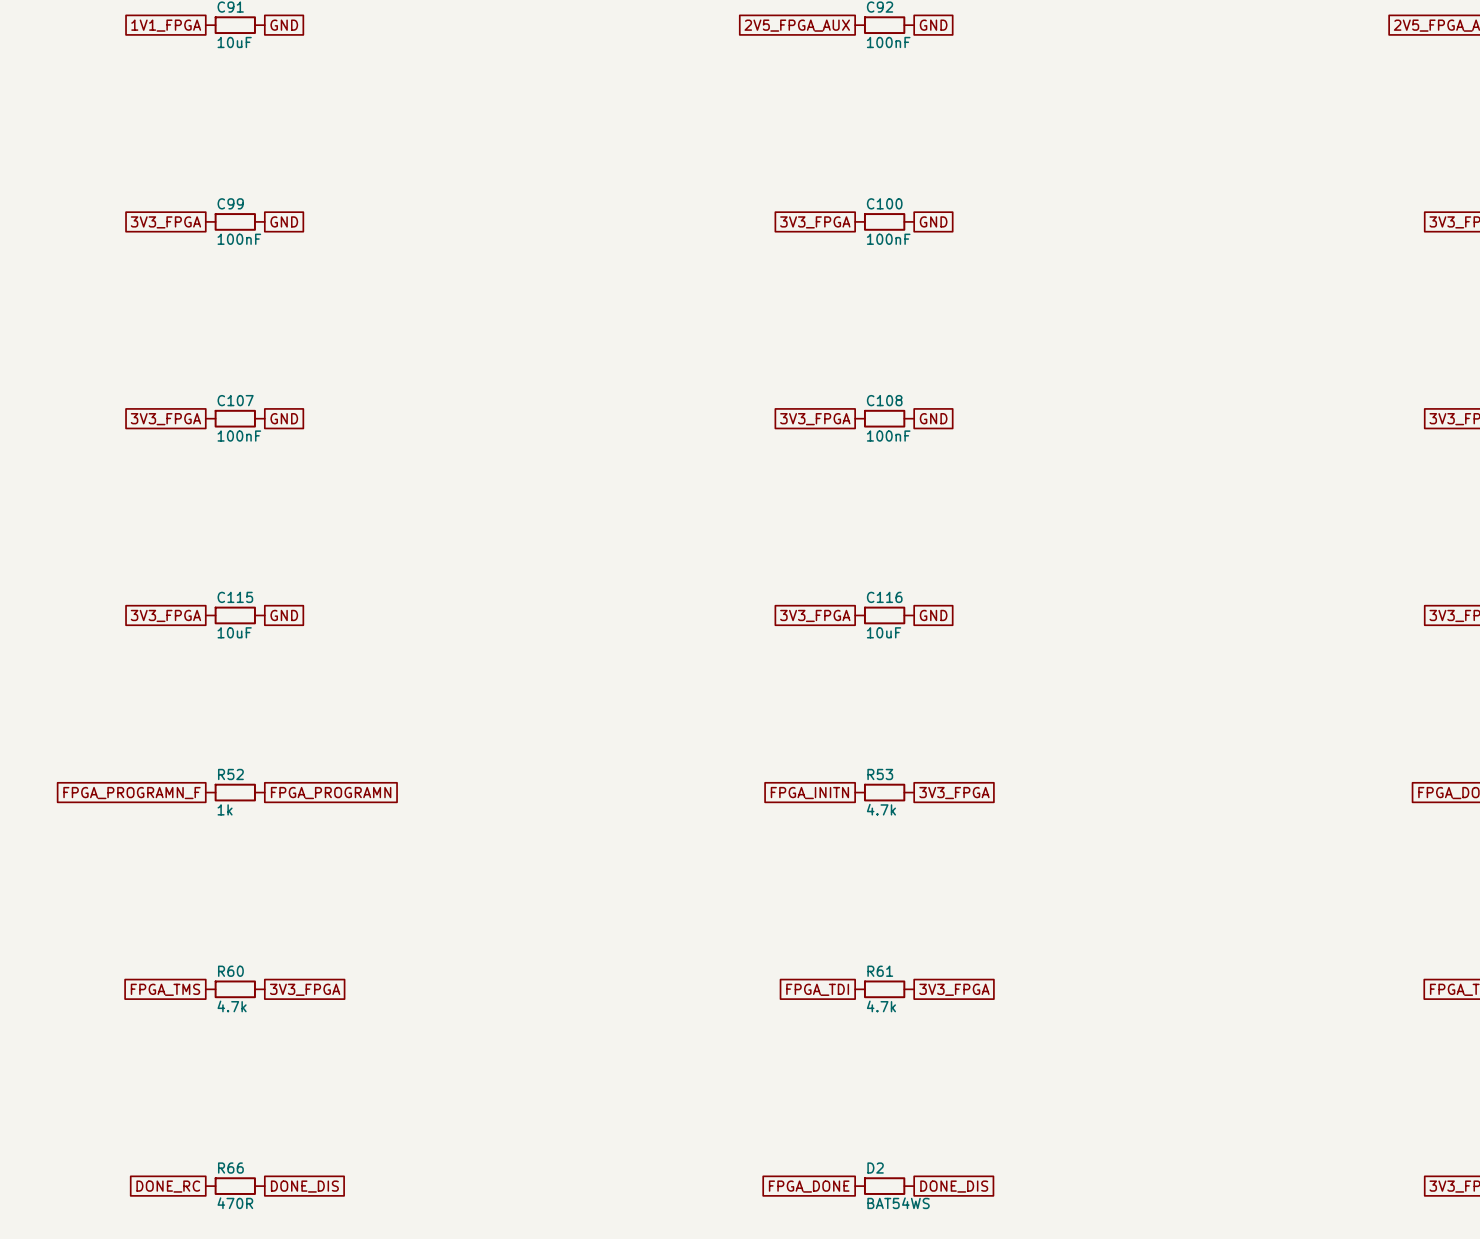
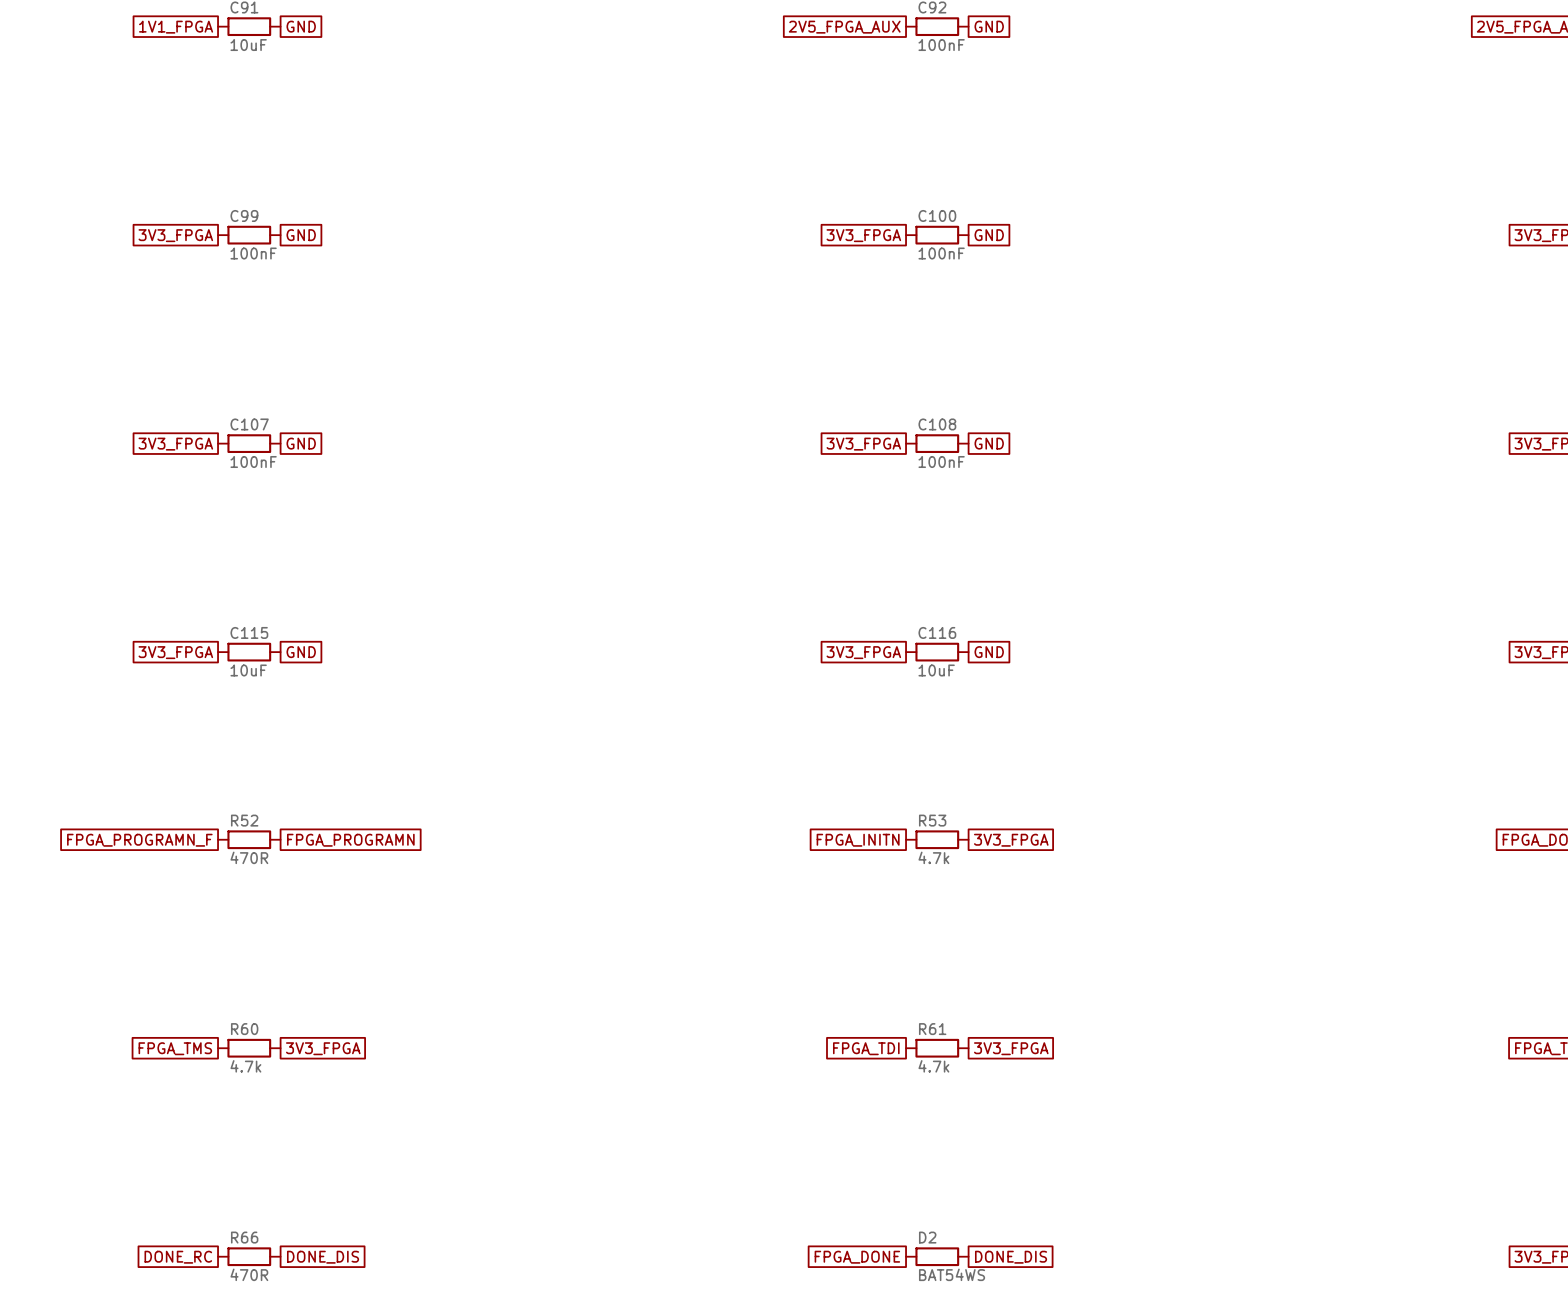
R52 value: 1k (225, 809) -> 470R (249, 857)

